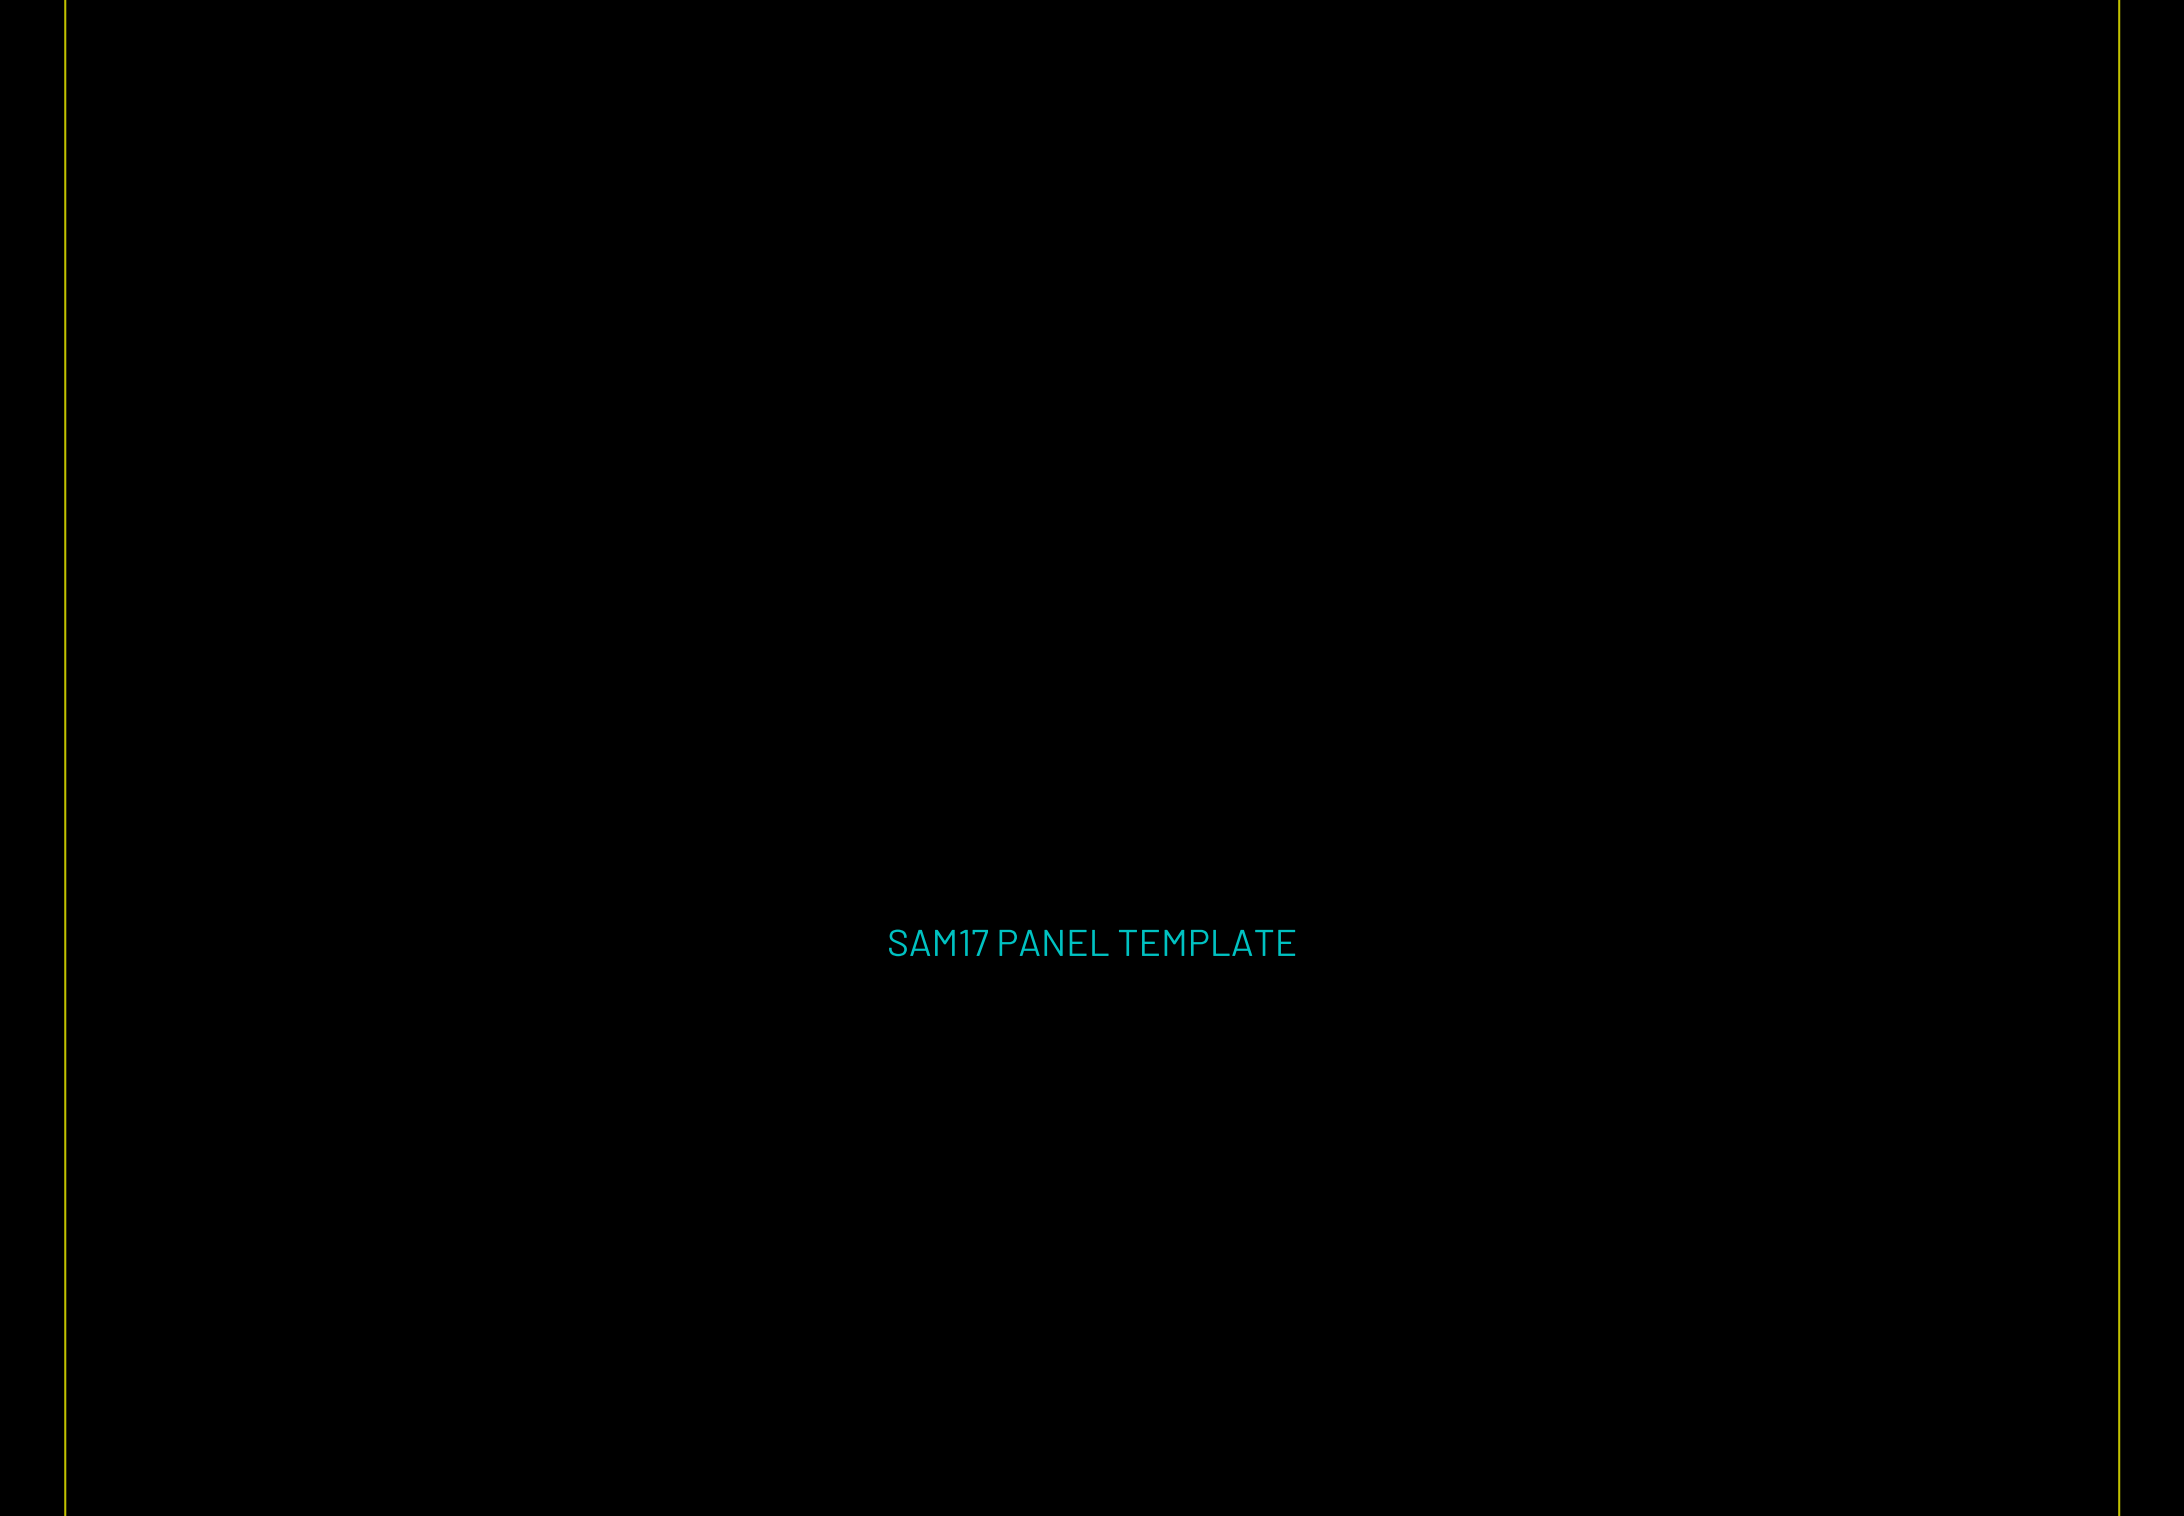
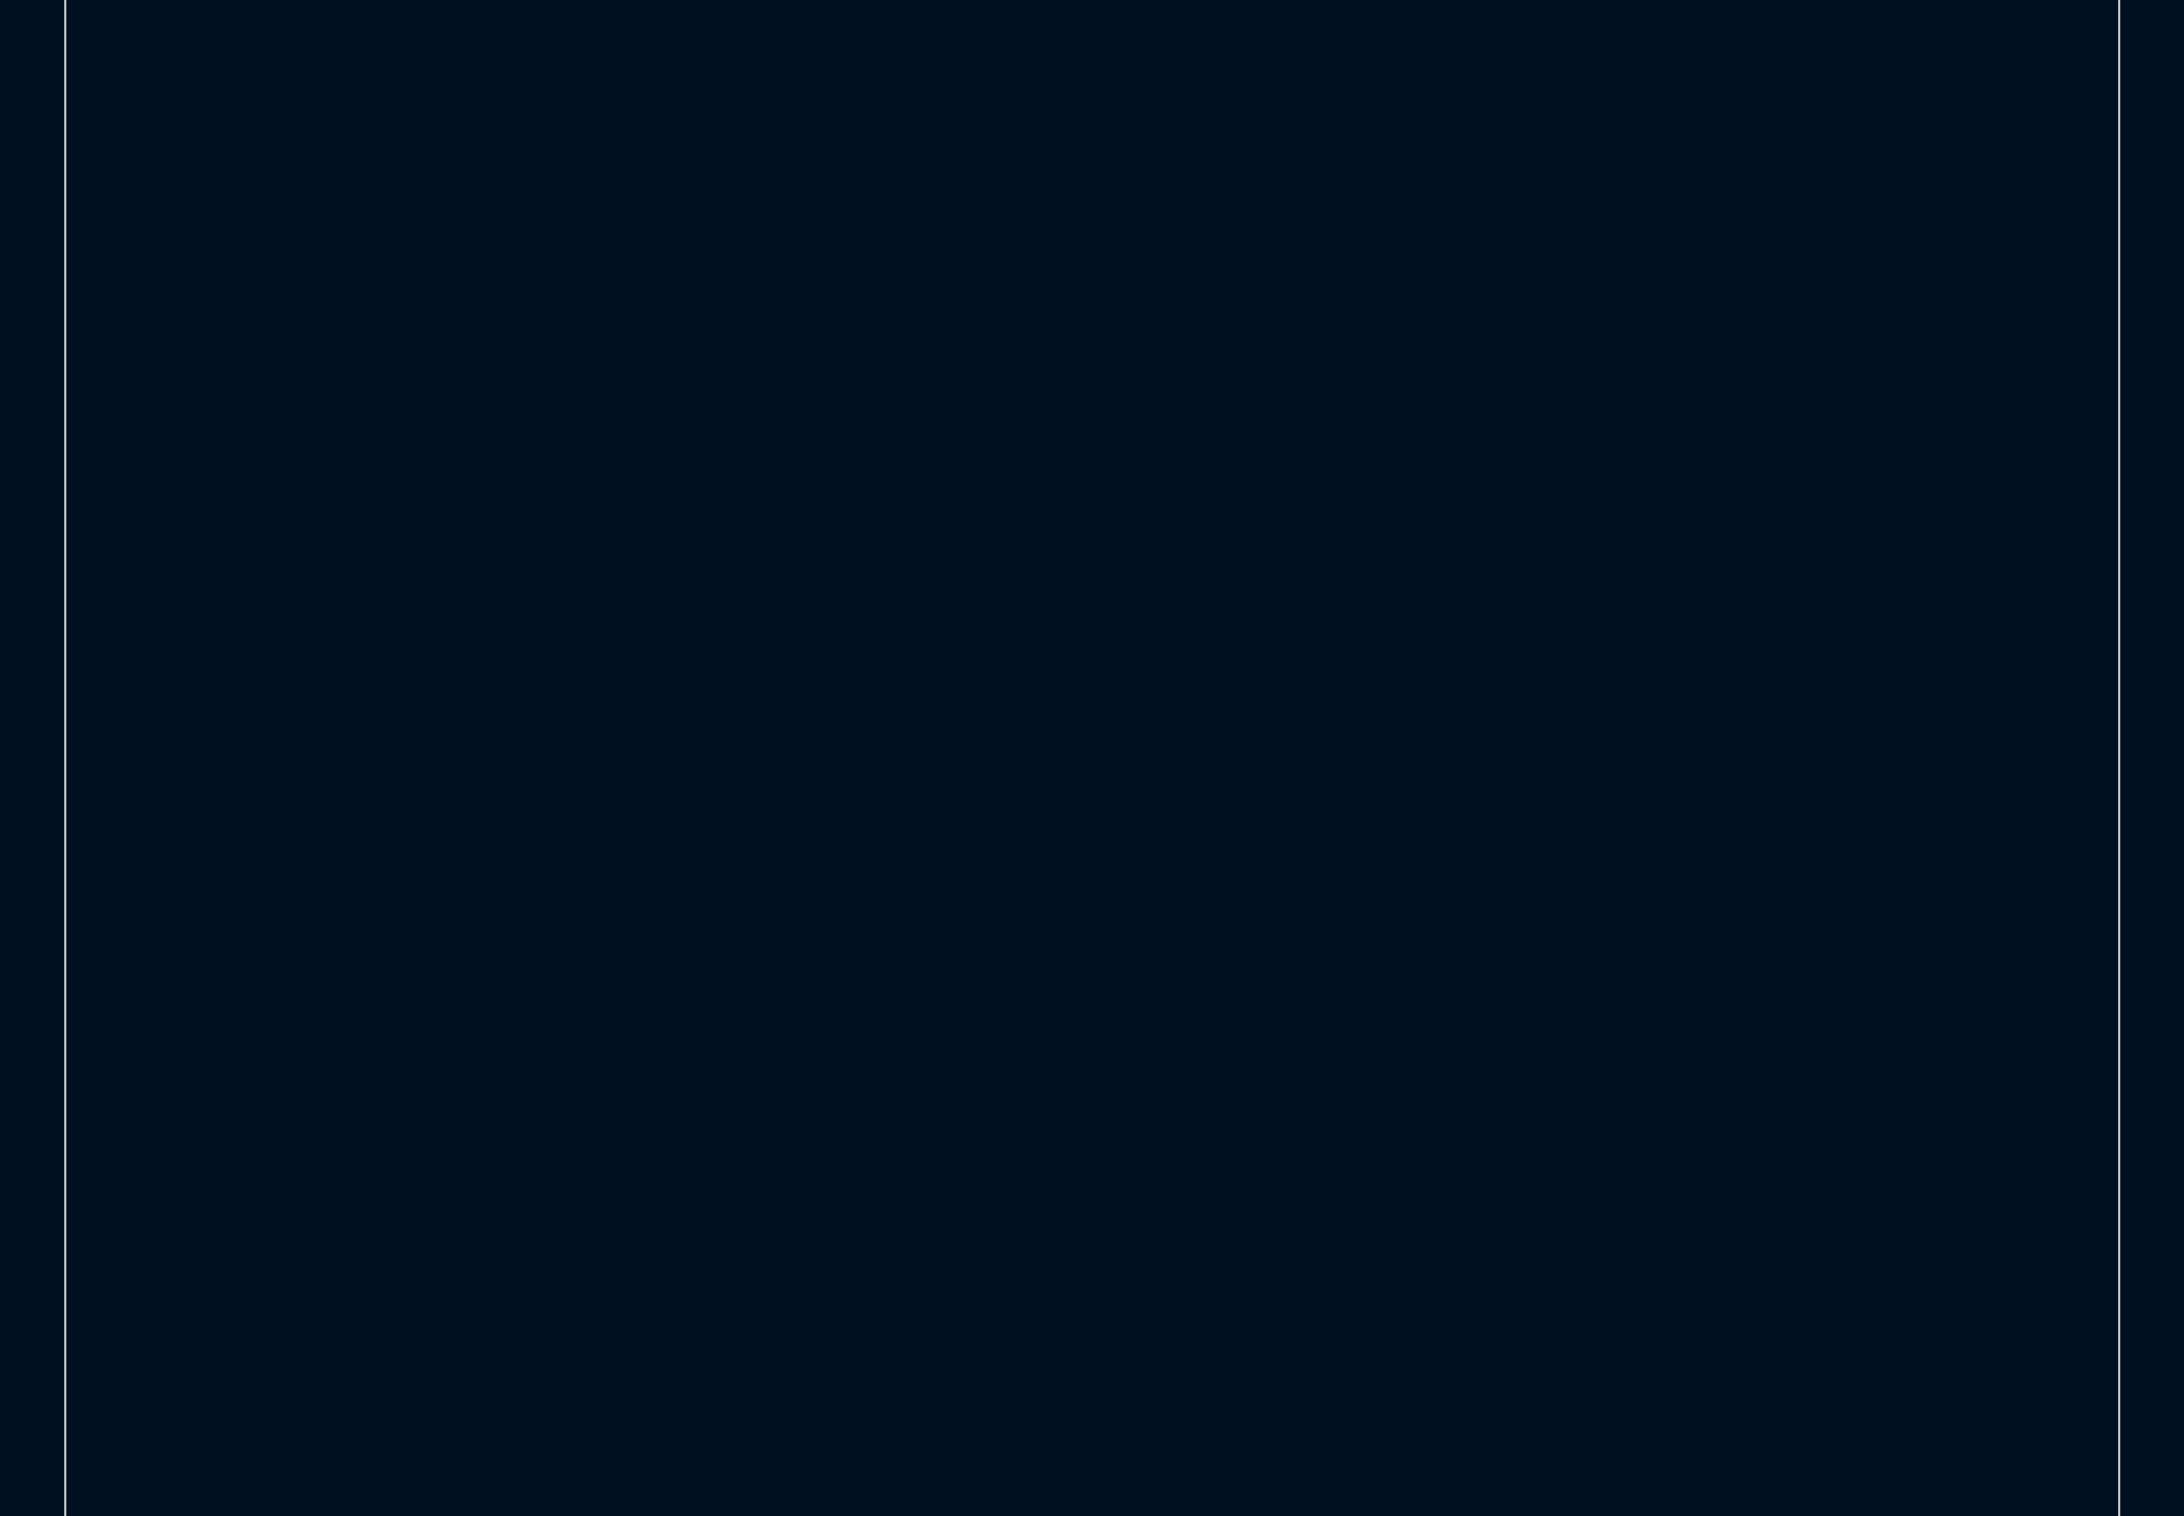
text: SAM17 PANEL TEMPLATE (1092, 942) -> none

